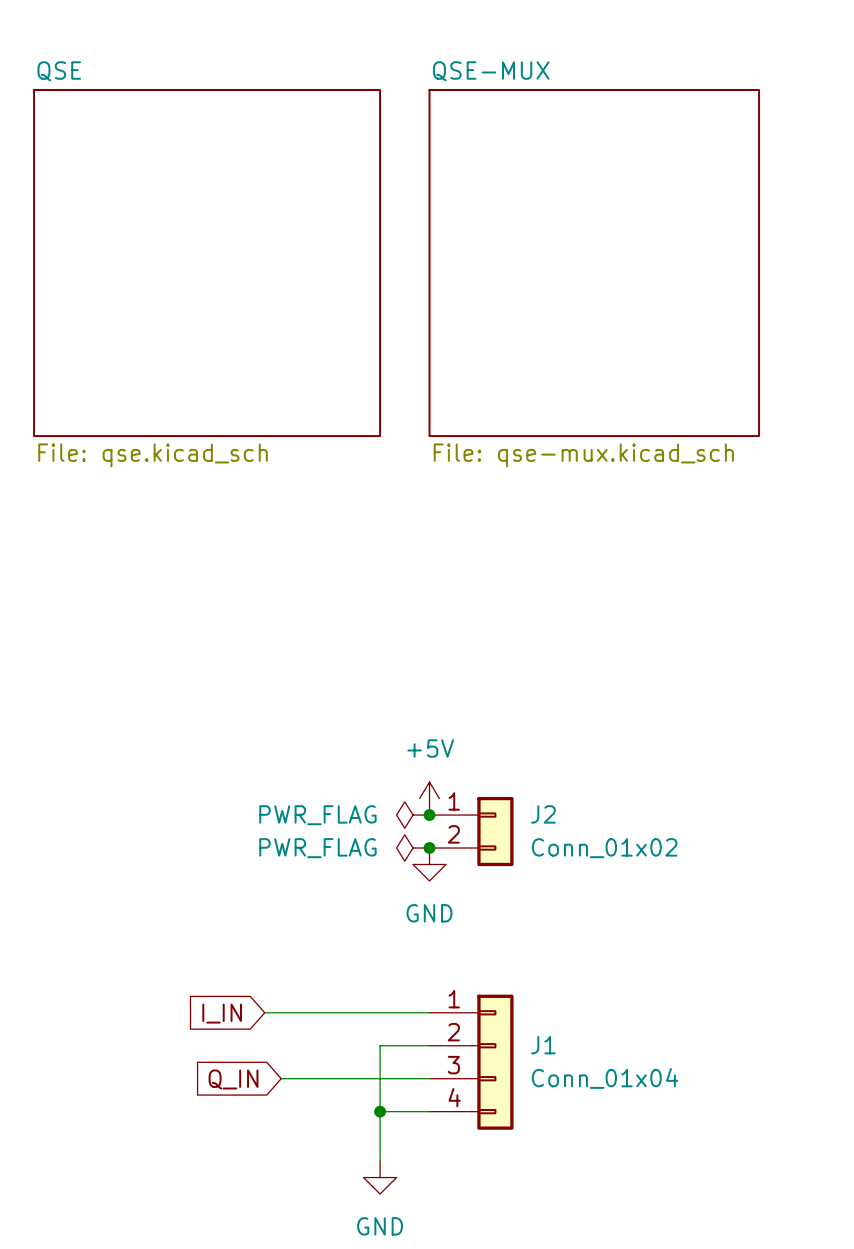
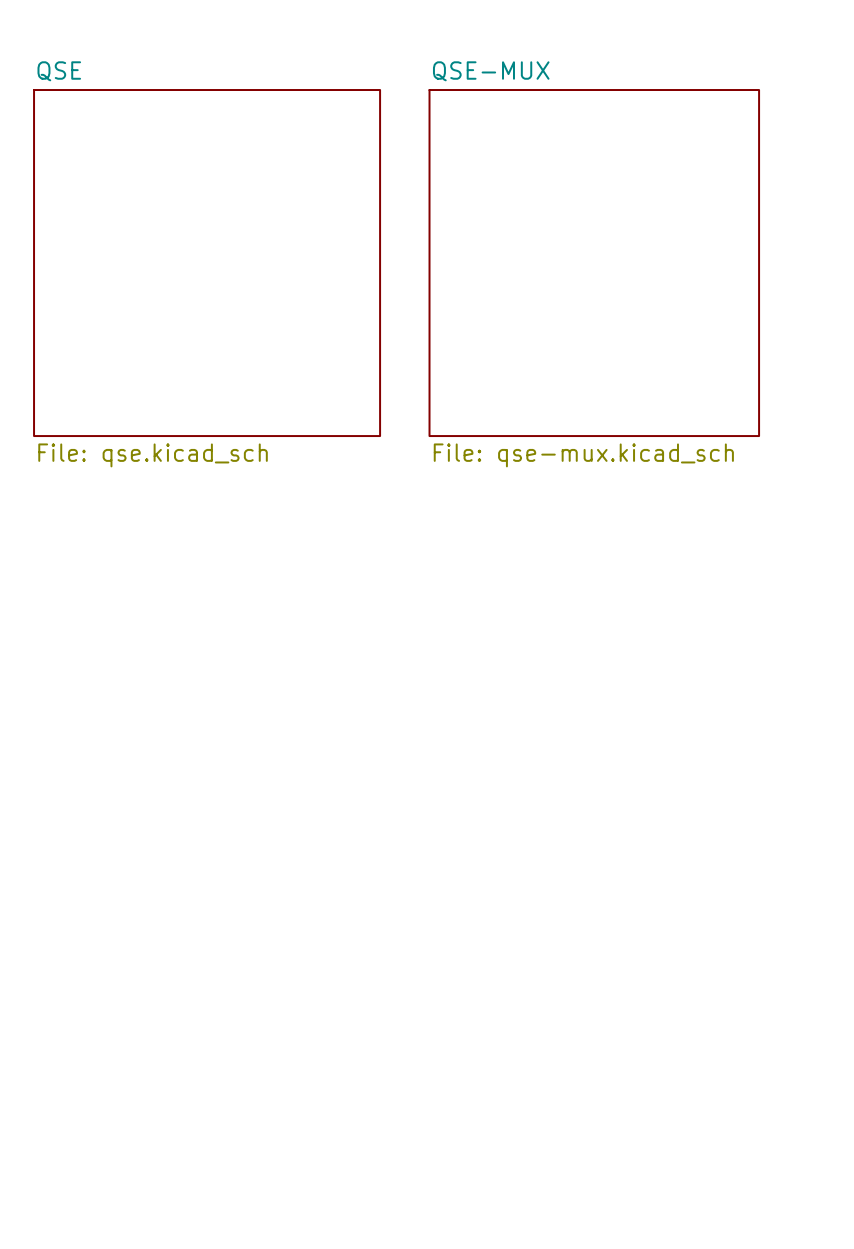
power symbol: +5V (429, 798) -> none
power symbol: PWR_FLAG (413, 815) -> none
junction: (429, 815) -> none
J2: Conn_01x02 (471, 831) -> none
power symbol: PWR_FLAG (413, 848) -> none
junction: (429, 848) -> none
power symbol: GND (429, 864) -> none
wire: (264, 1012) (429, 1012) -> none
global label: I_IN (222, 1013) -> none
wire: (429, 1045) (380, 1045) (380, 1161) -> none
J1: Conn_01x04 (471, 1062) -> none
wire: (281, 1078) (429, 1078) -> none
global label: Q_IN (233, 1079) -> none
wire: (380, 1111) (429, 1111) -> none
junction: (380, 1111) -> none
power symbol: GND (380, 1177) -> none

